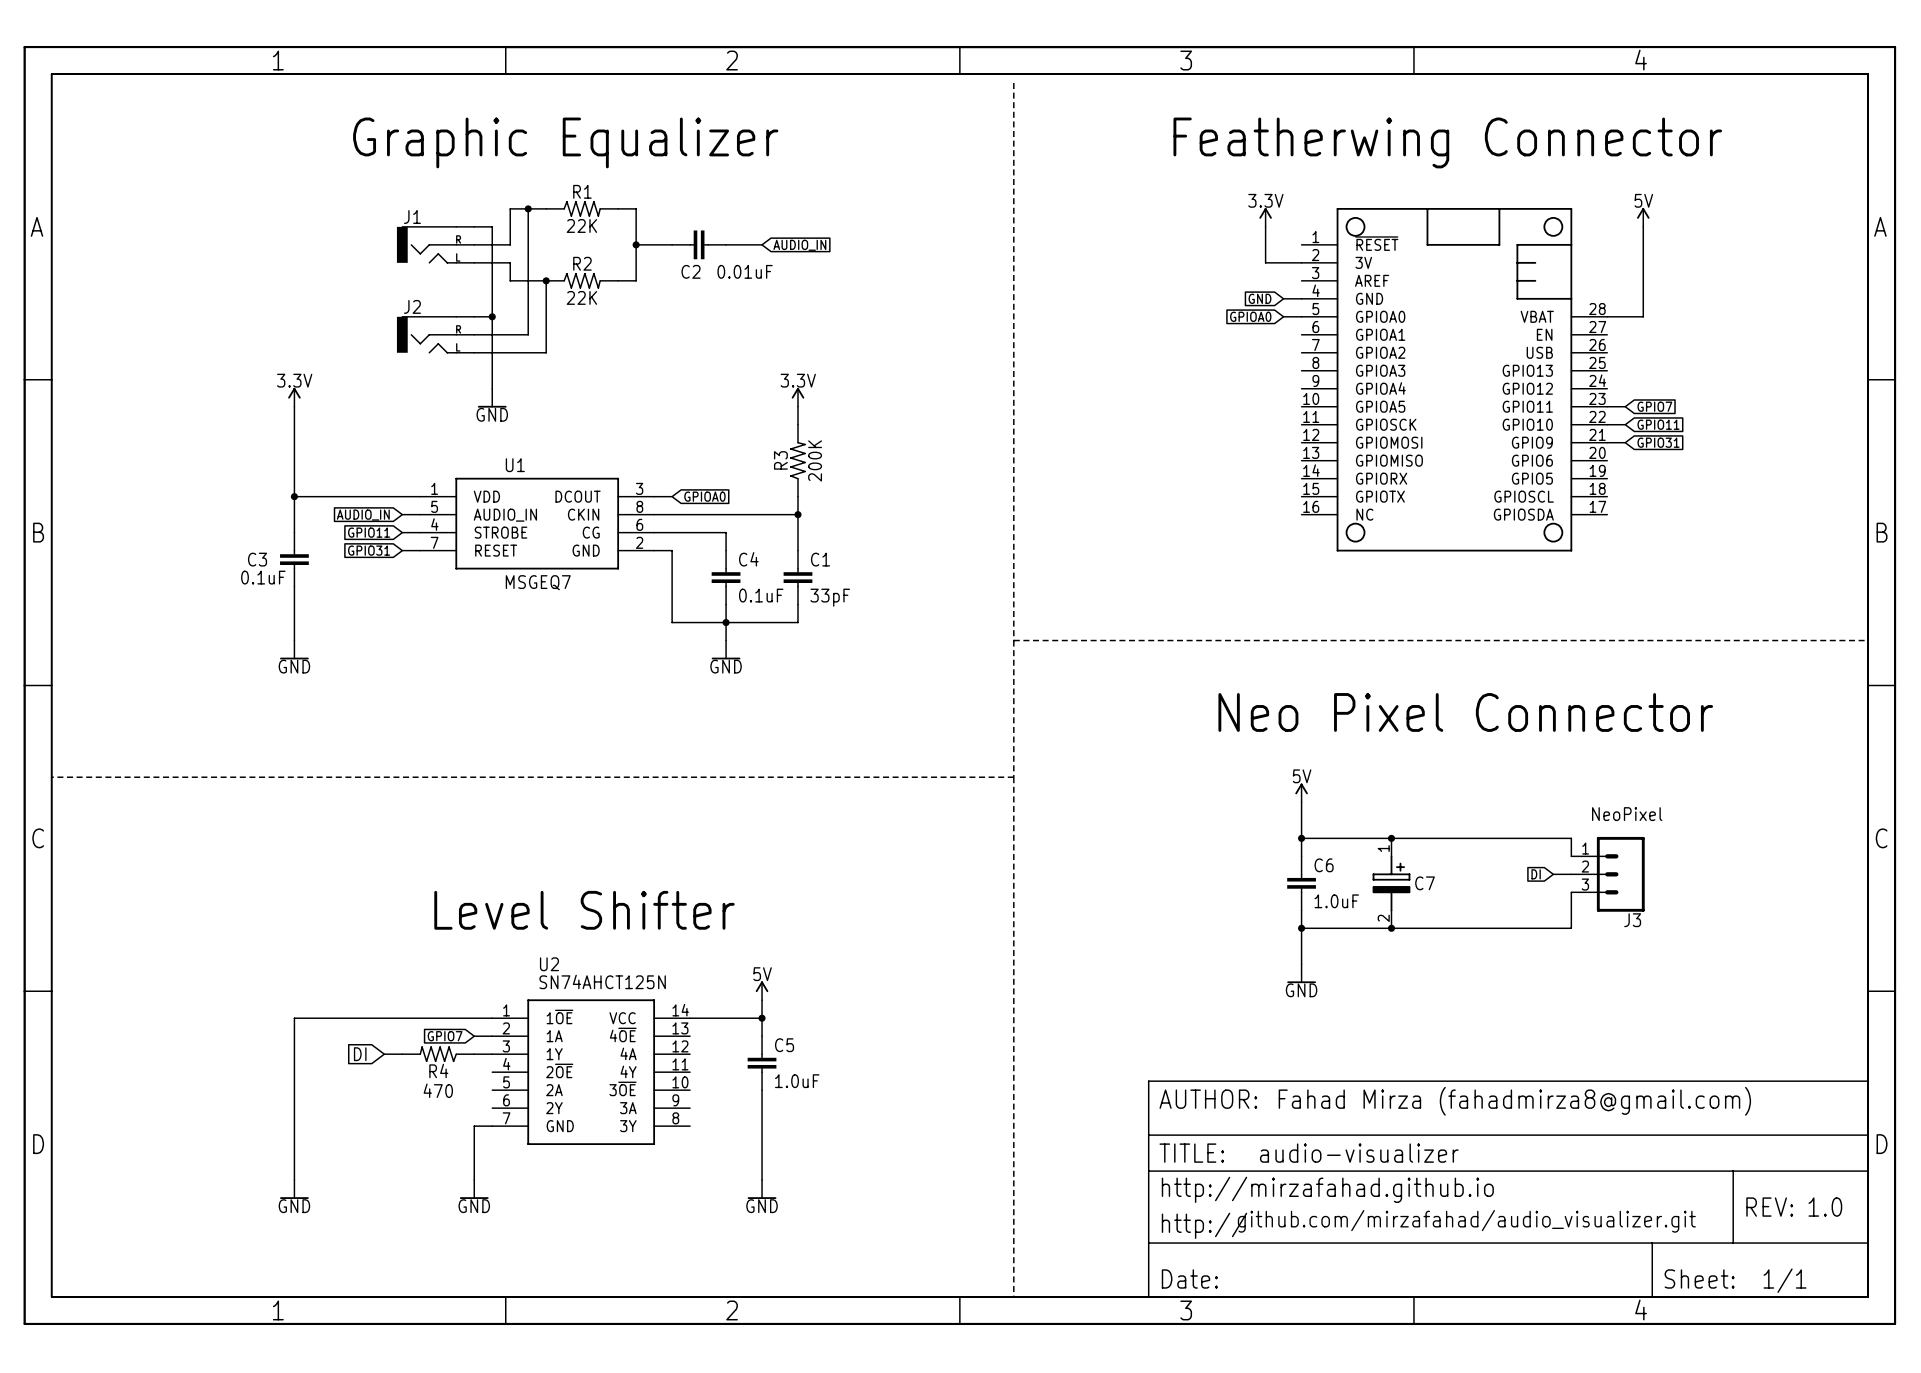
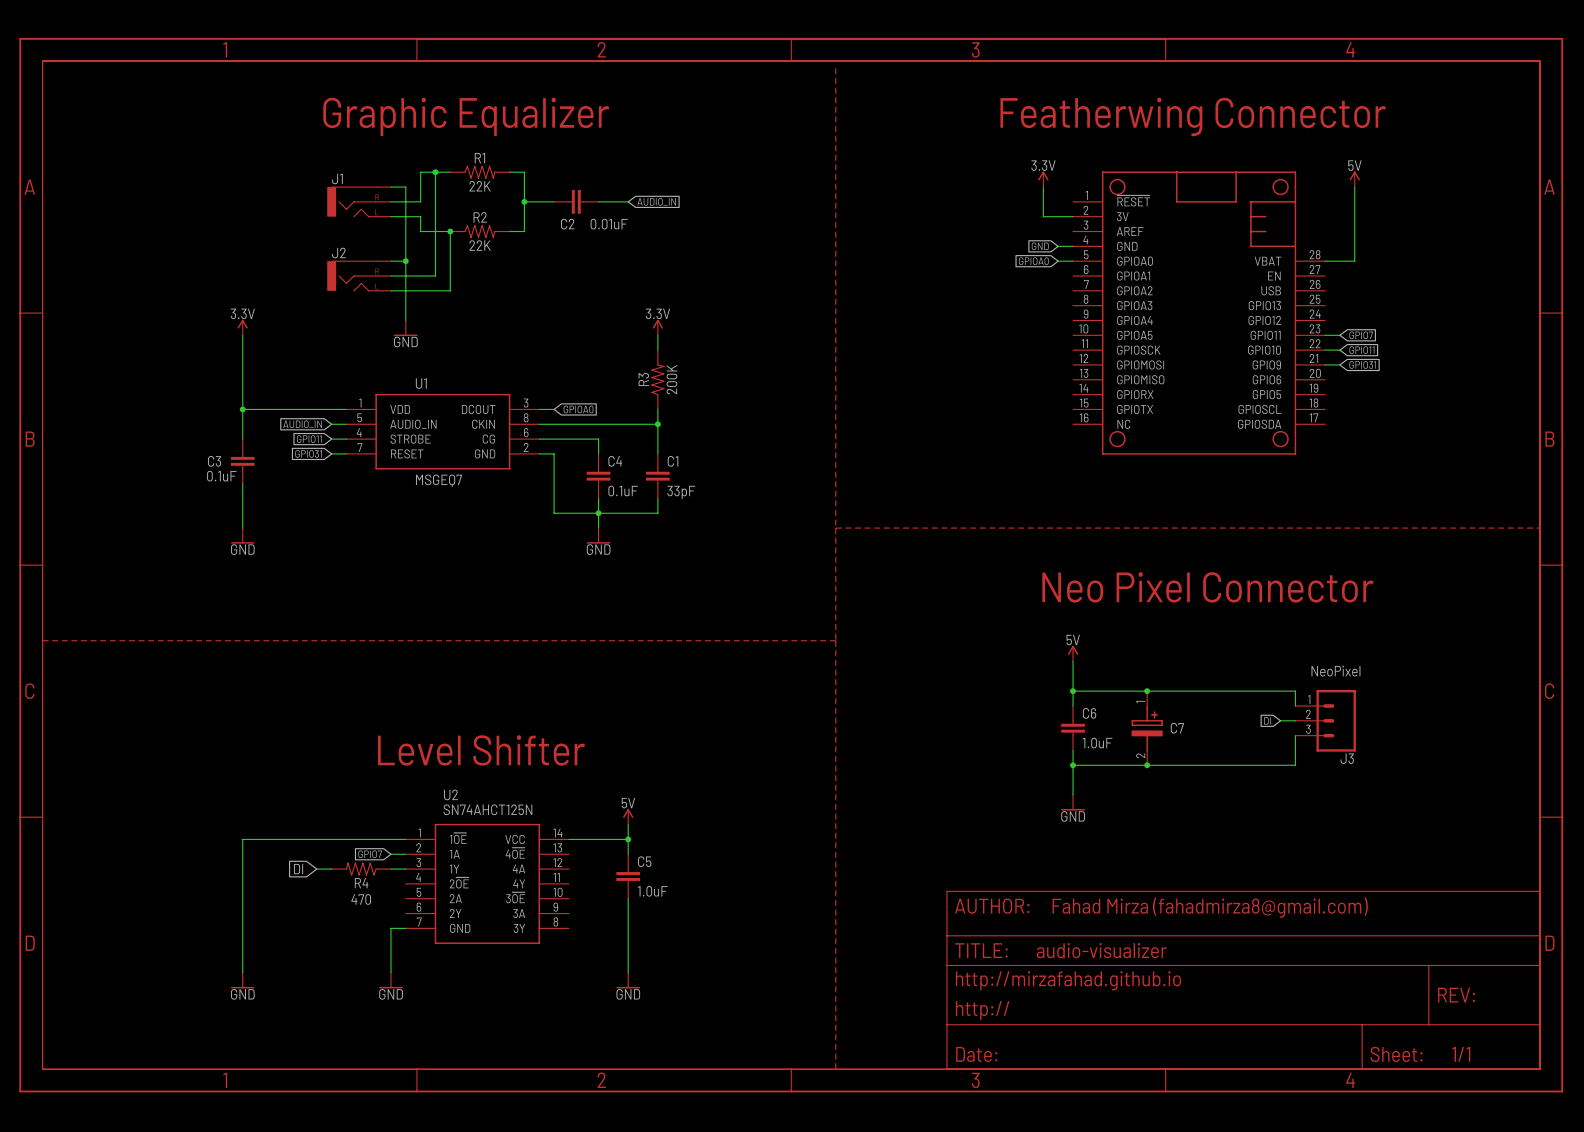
text: 1.0 (1825, 1207) -> none
text: github.com/mirzafahad/audio_visualizer.git (1466, 1221) -> none

